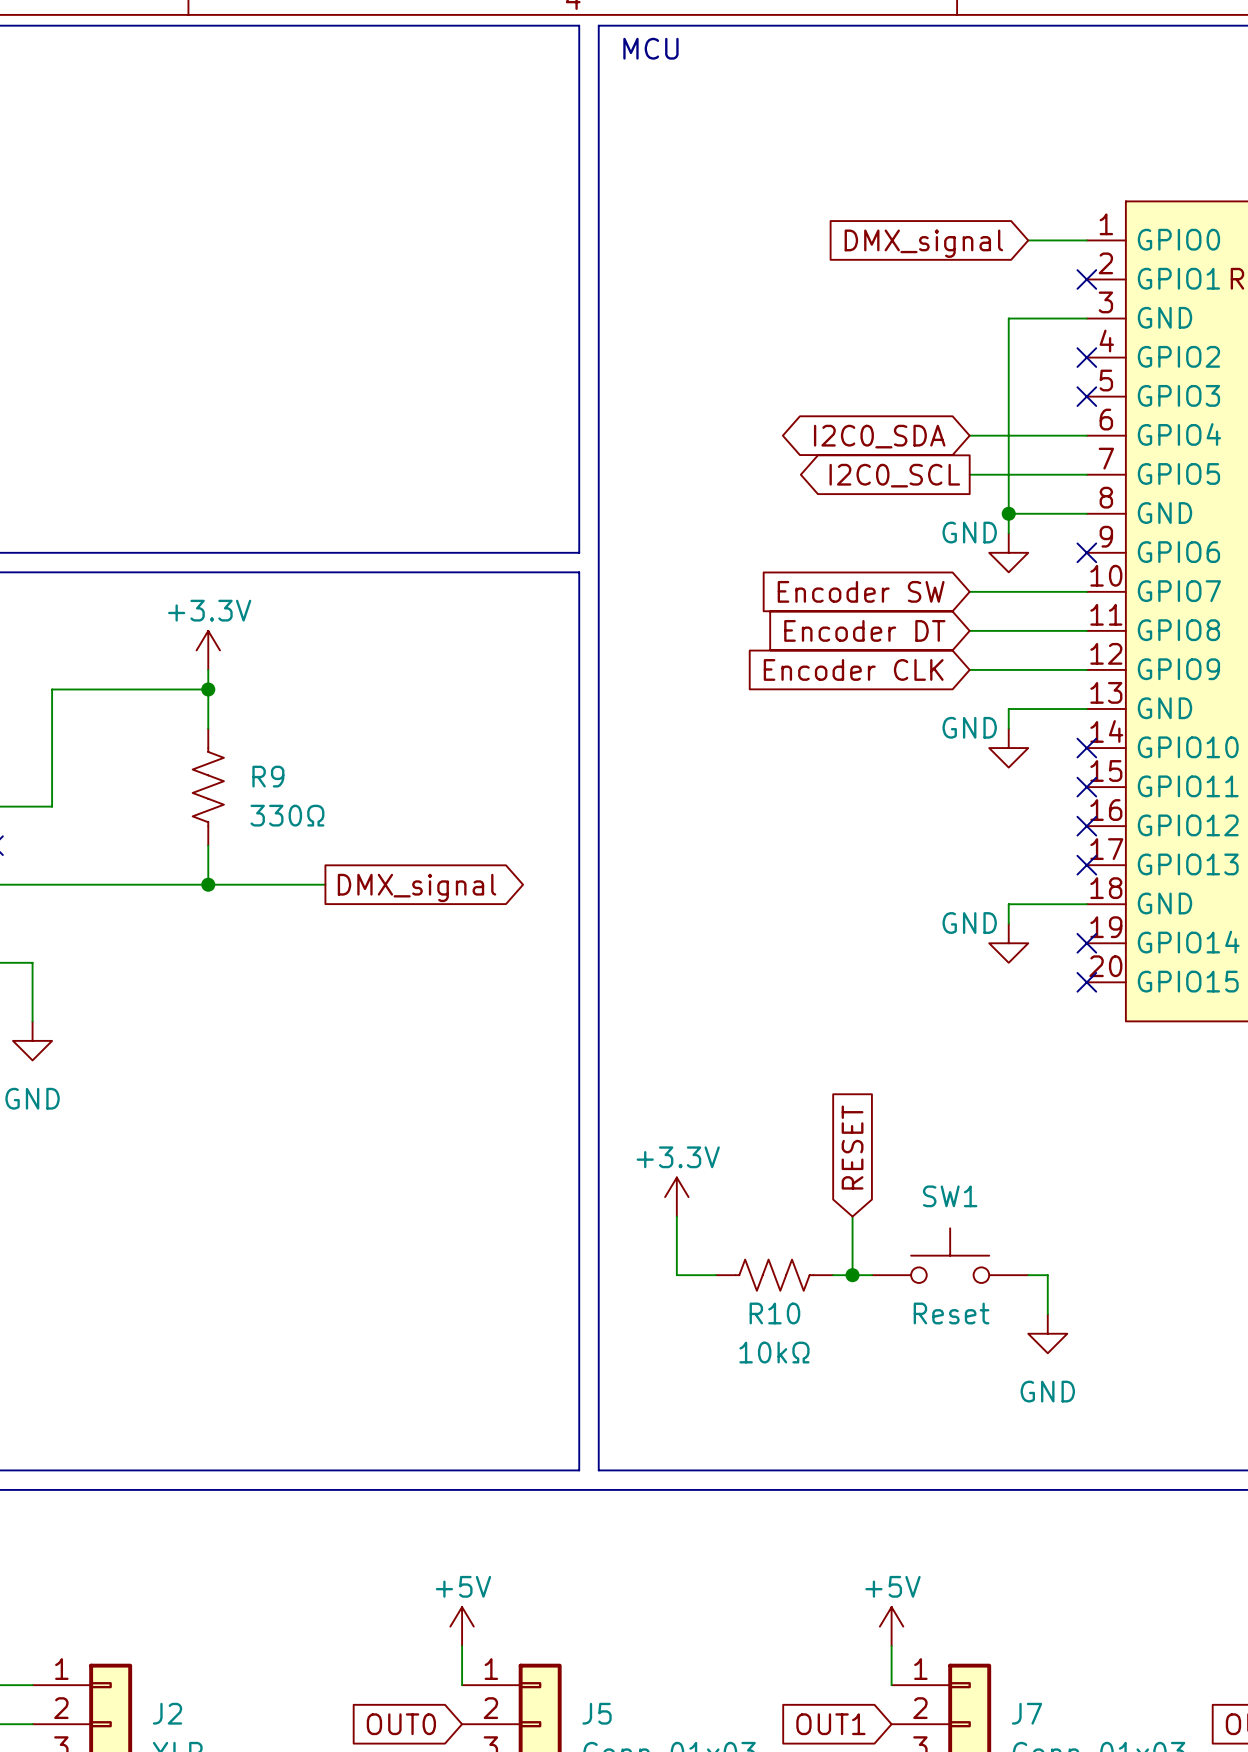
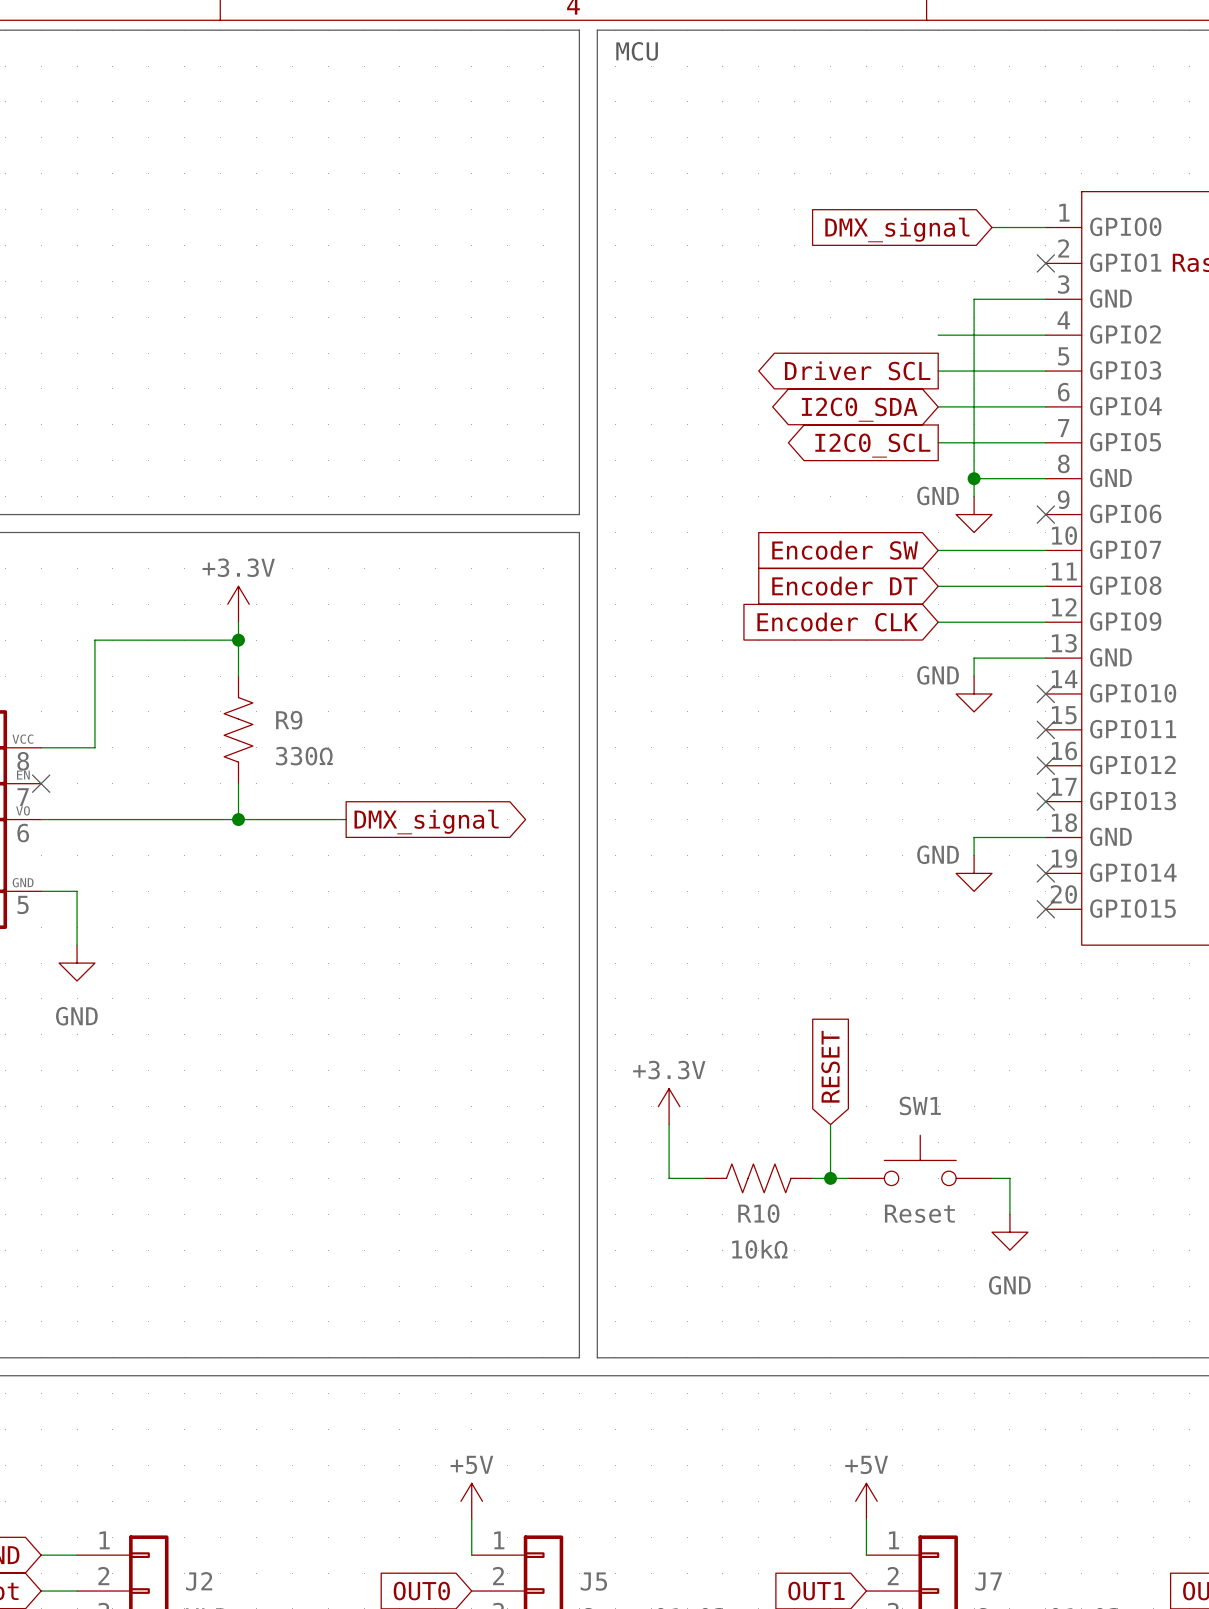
wire: none -> (938, 335) (1045, 335)
no-connect mark: (1086, 357) -> none
global label: none -> Driver SCL (857, 370)
wire: none -> (938, 371) (1045, 371)
no-connect mark: (1086, 396) -> none

